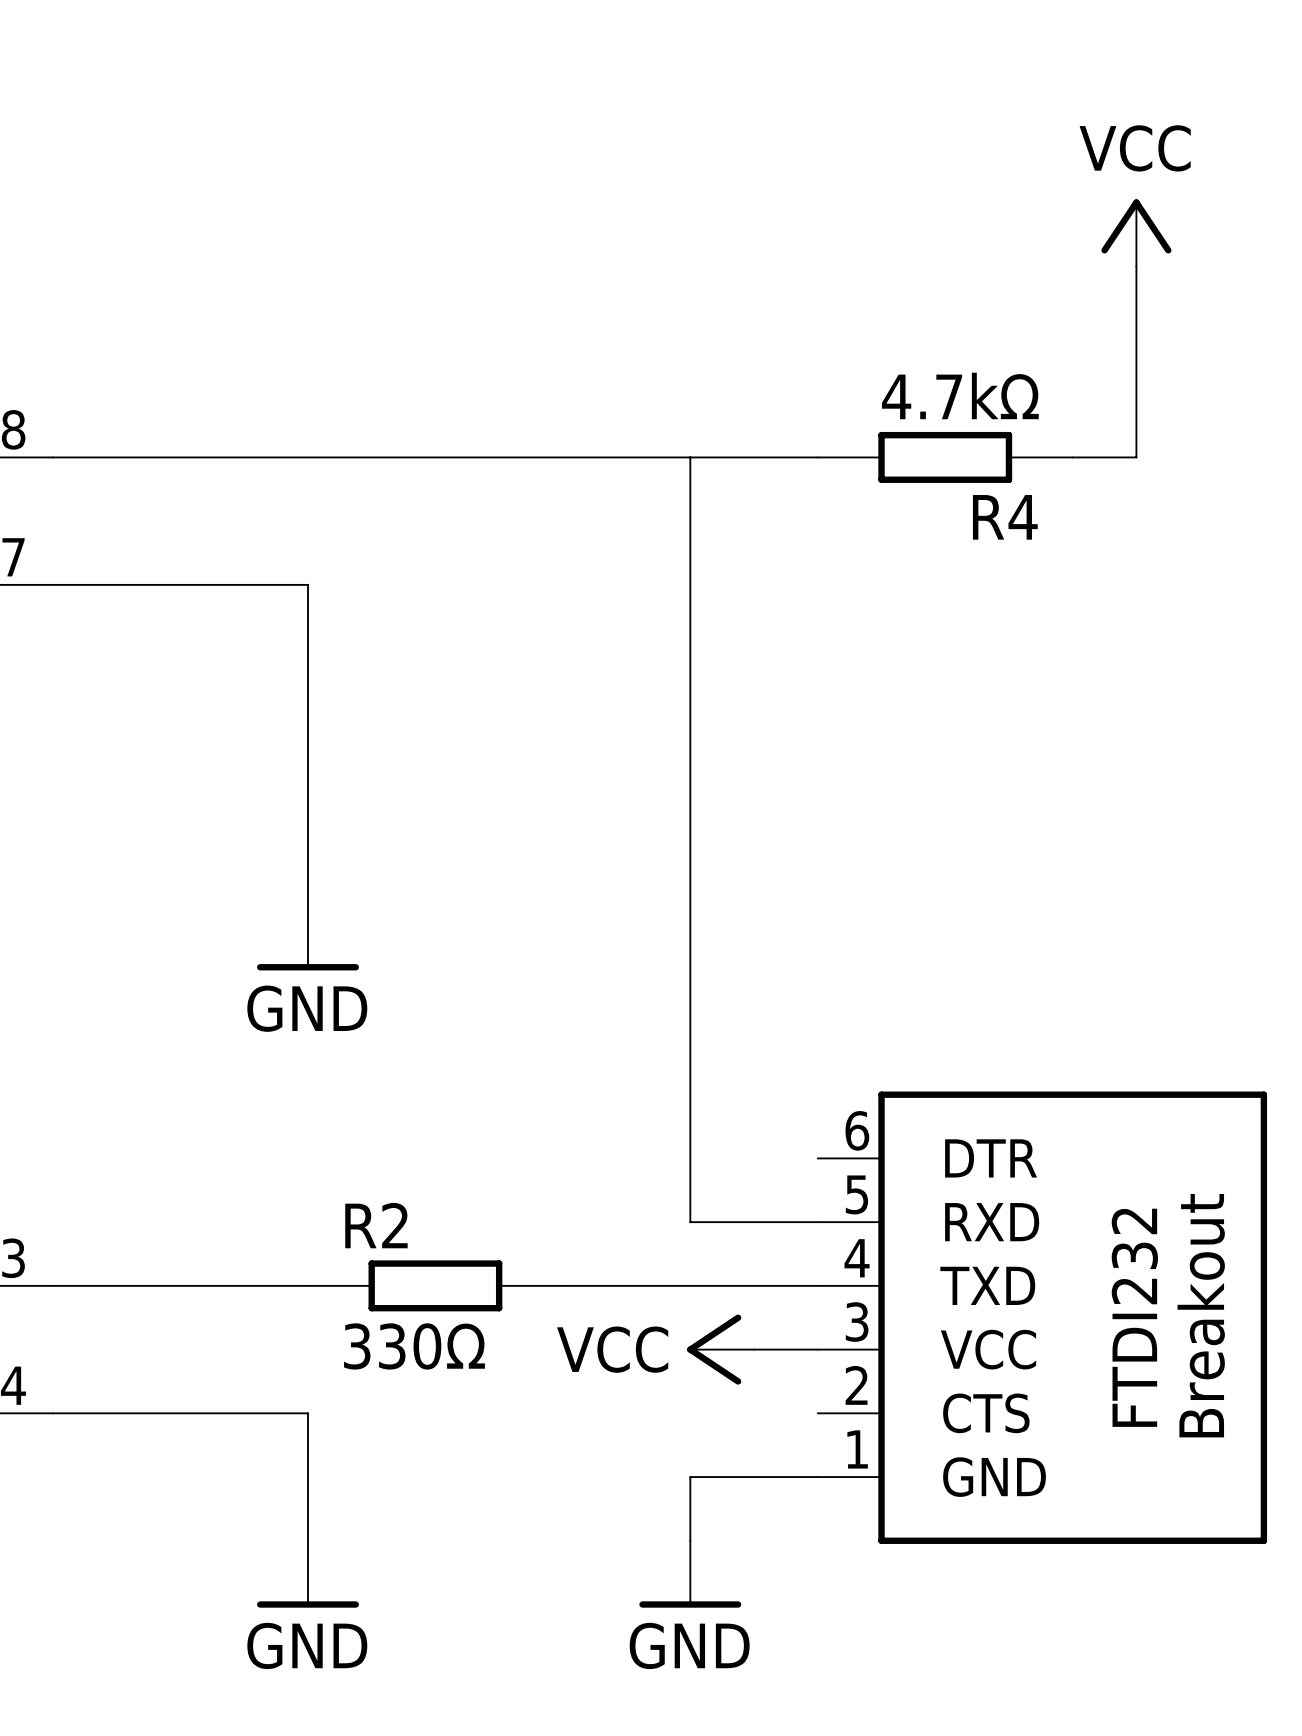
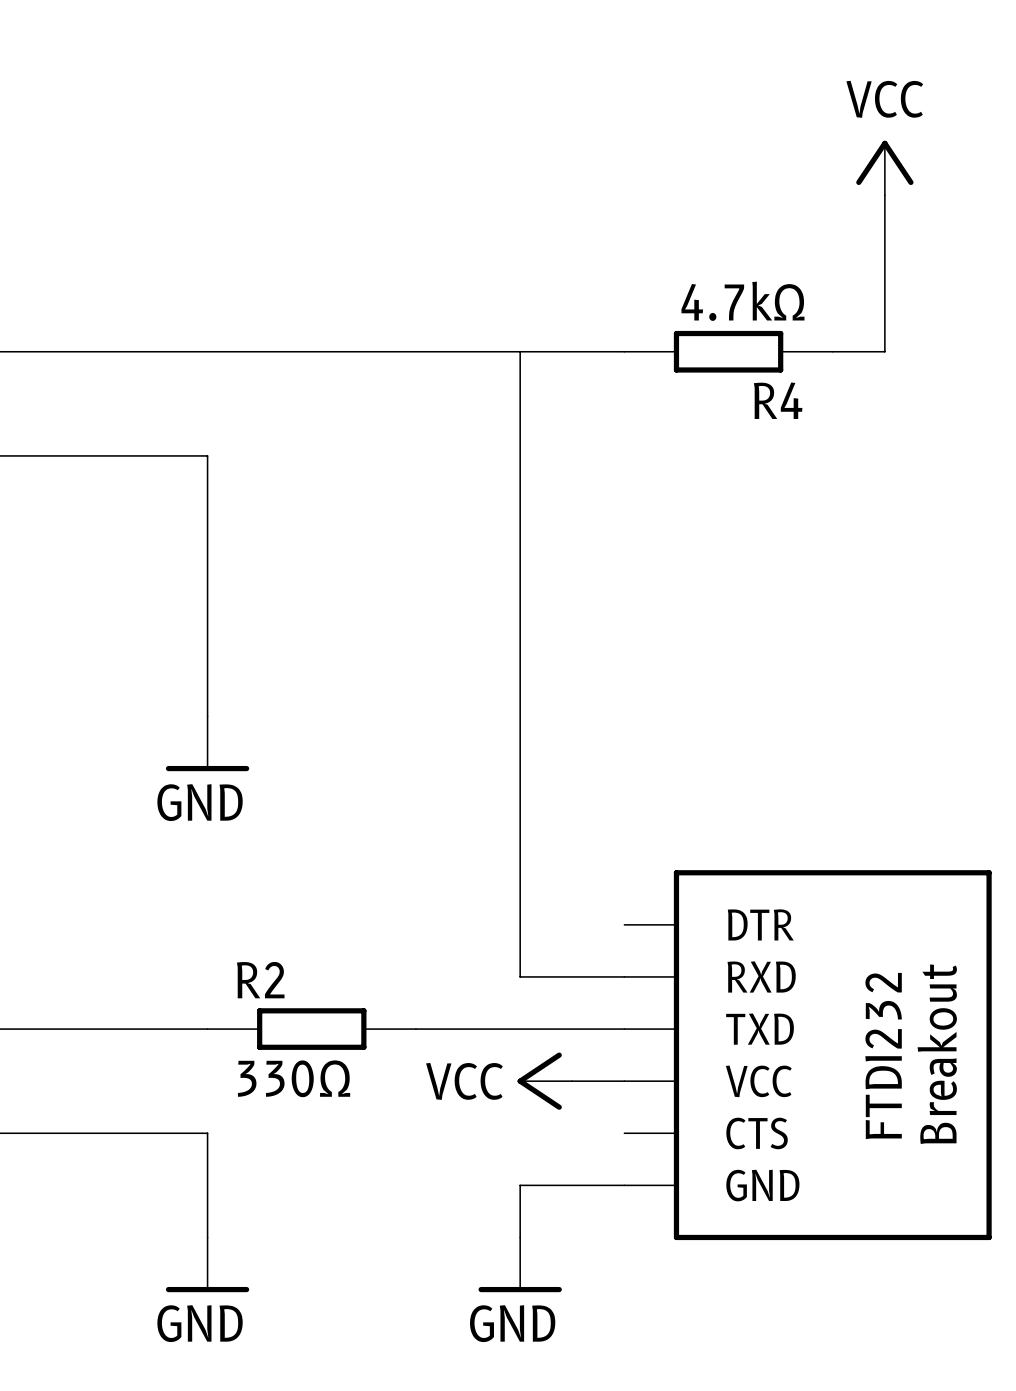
part pin number: 6 (857, 1130) -> none
part pin number: 5 (856, 1194) -> none
part pin number: 4 (857, 1258) -> none
part pin number: 3 (857, 1322) -> none
part pin number: 2 (856, 1385) -> none
part pin number: 1 (857, 1449) -> none

